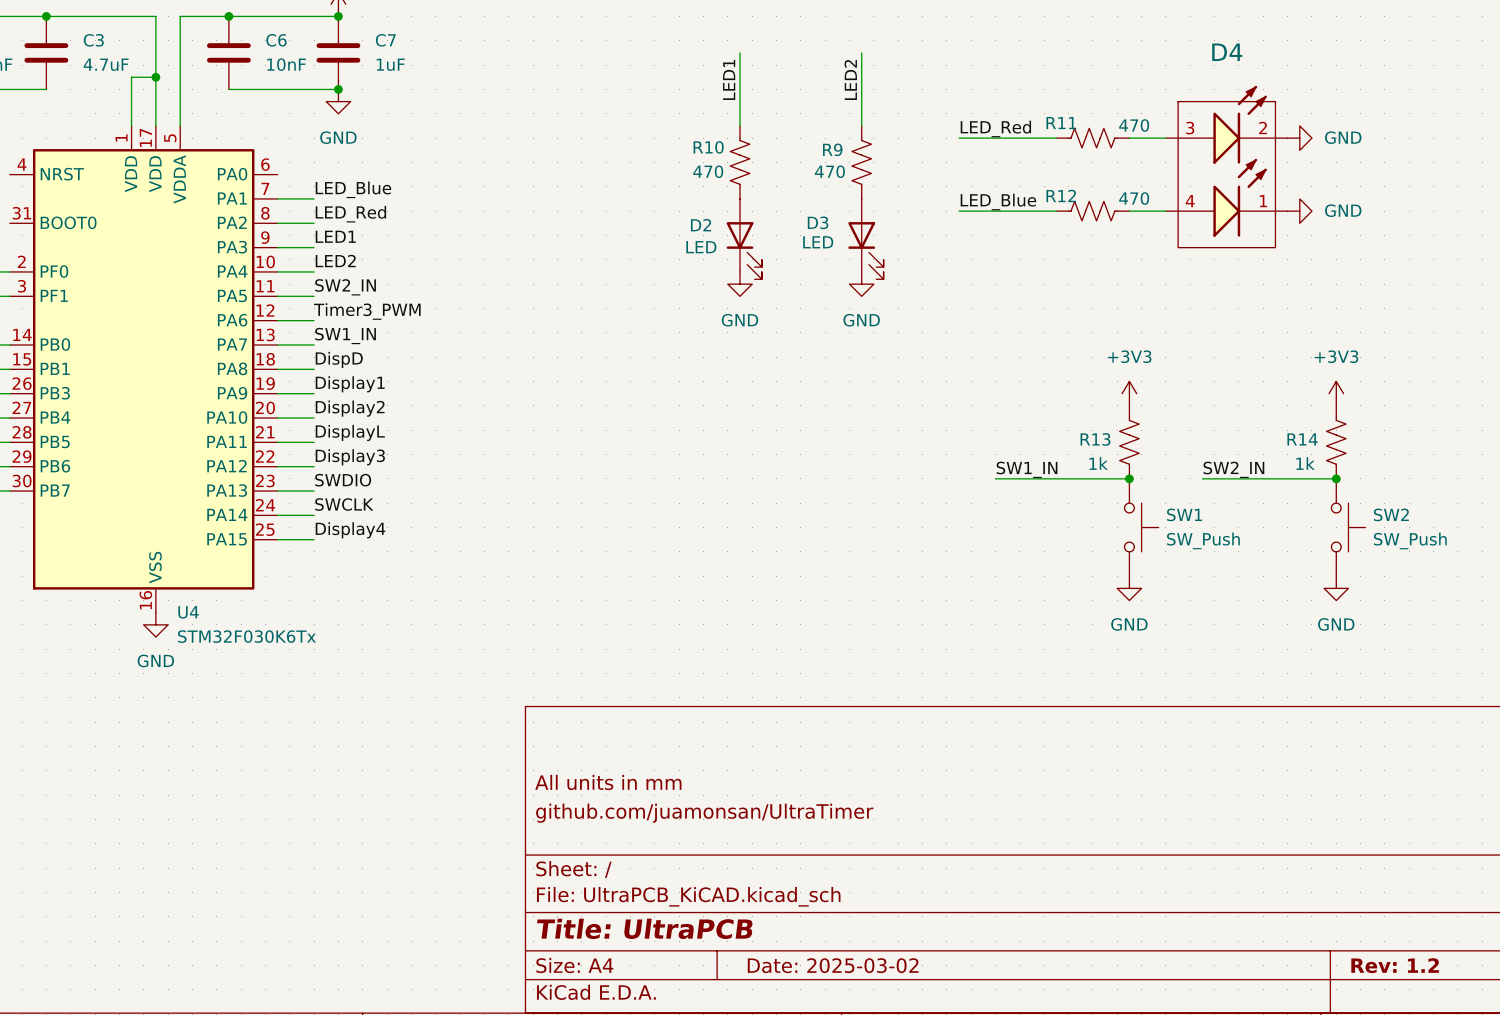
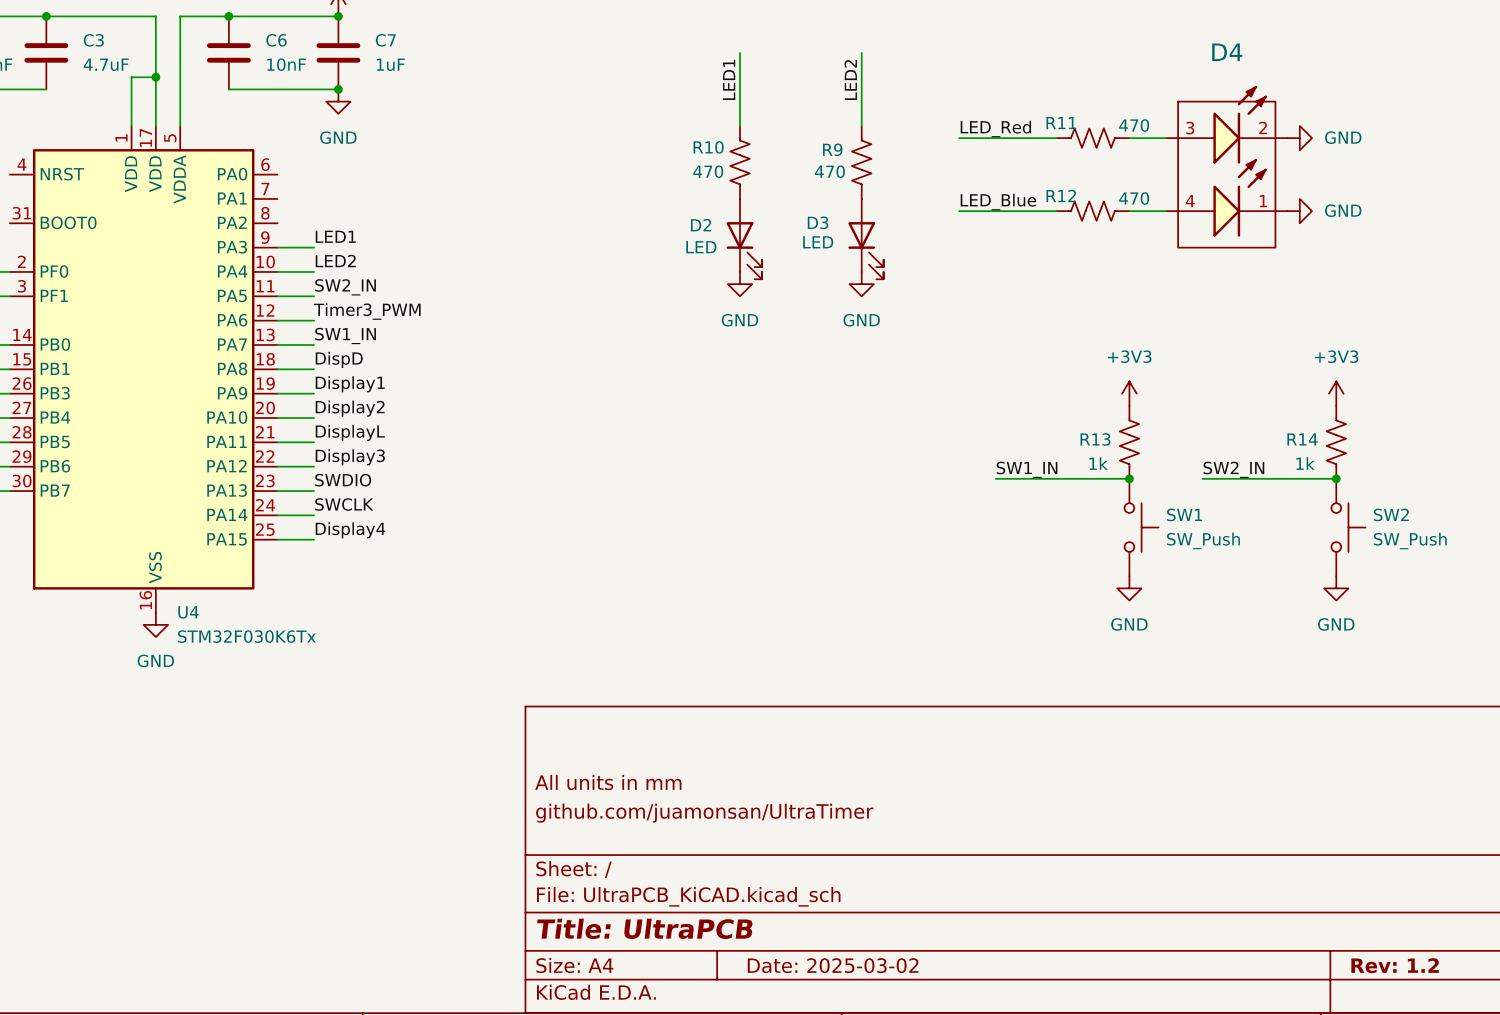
label: LED_Blue (353, 189) -> none
wire: (277, 198) (314, 198) -> none
label: LED_Red (350, 214) -> none
wire: (277, 223) (314, 223) -> none

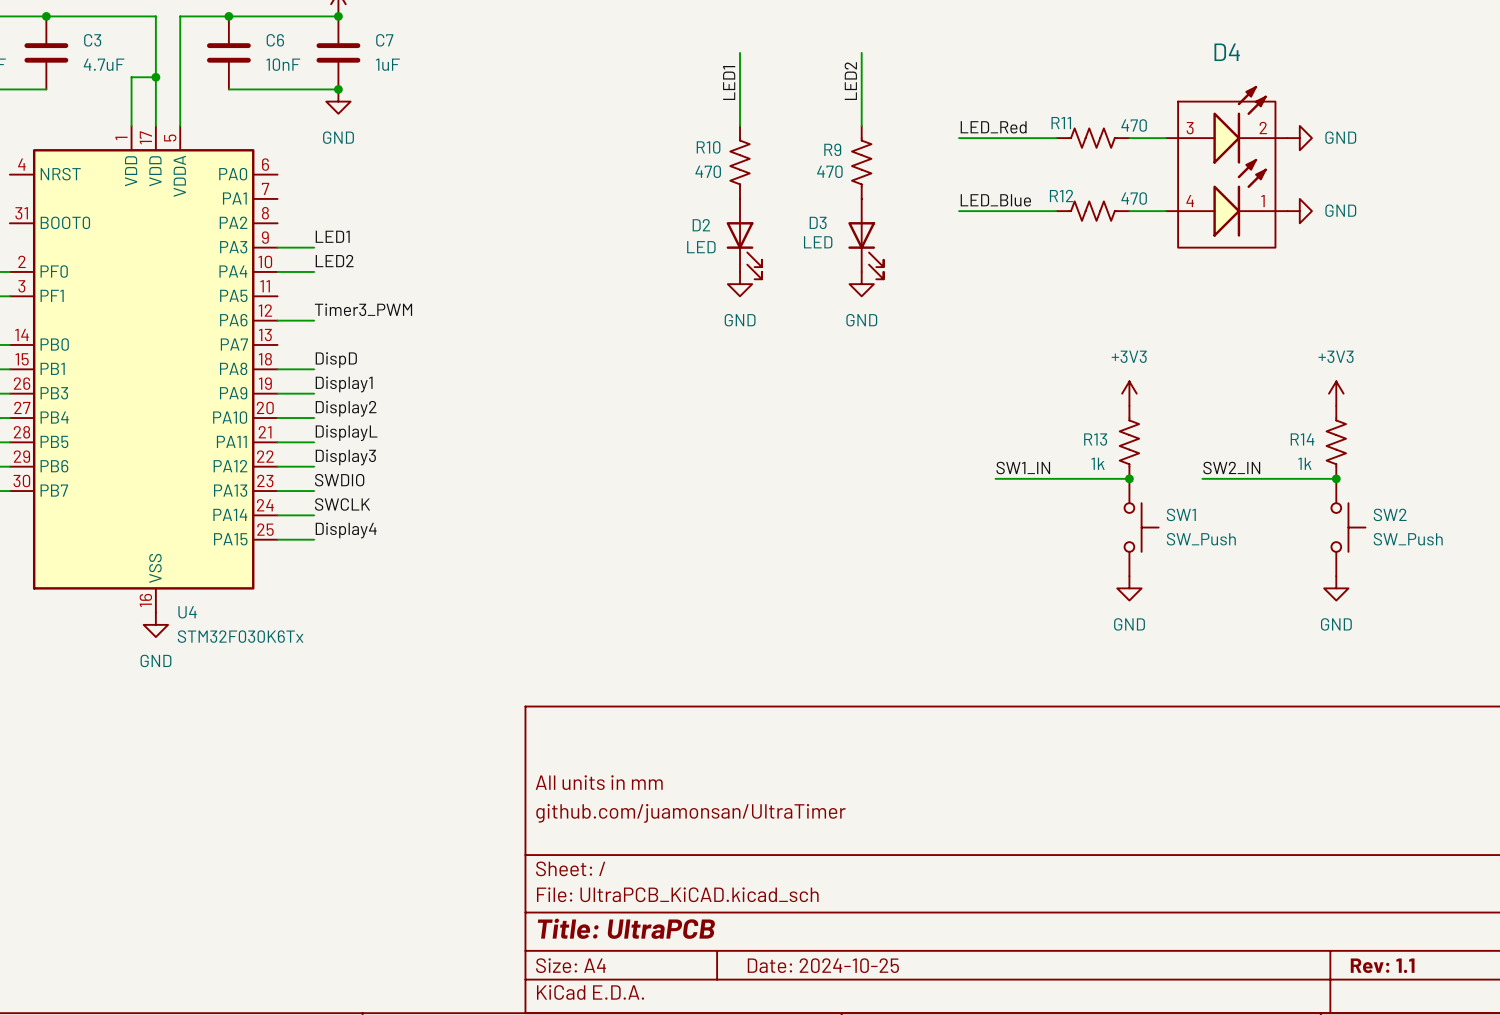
label: SW2_IN (345, 287) -> none
wire: (277, 296) (314, 296) -> none
label: SW1_IN (345, 335) -> none
wire: (277, 344) (314, 344) -> none
title block: Date: 2025-03-02 (833, 965) -> Date: 2024-10-25 (823, 965)
title block: Rev: 1.2 (1395, 965) -> Rev: 1.1 (1382, 965)

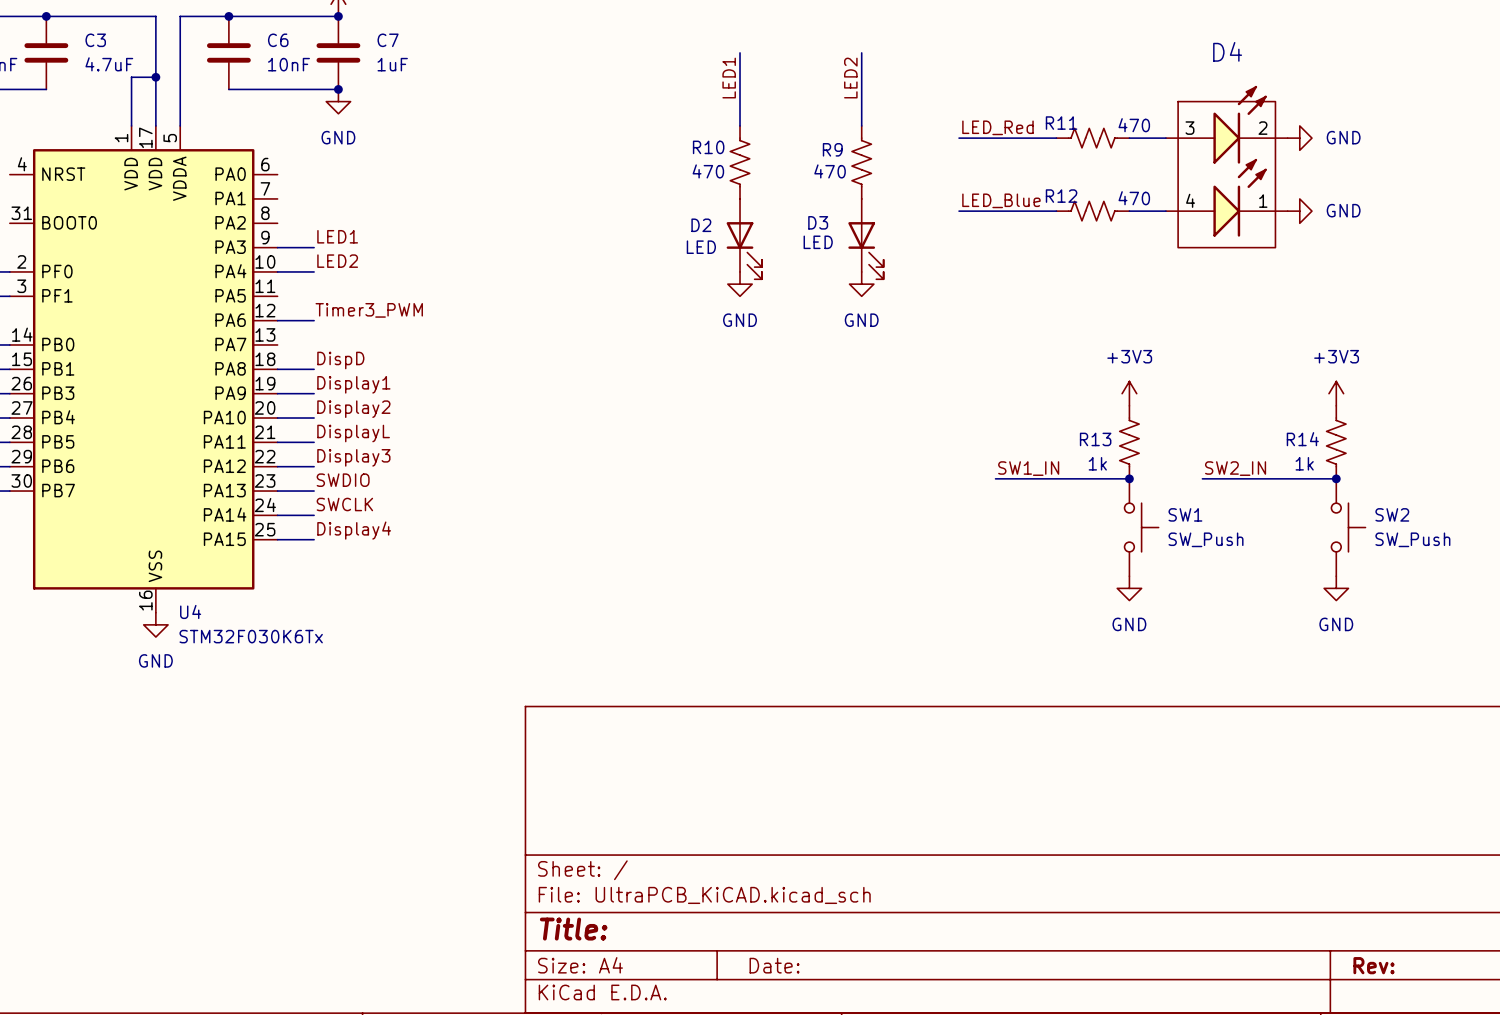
title block: All units in mm (599, 782) -> none
title block: github.com/juamonsan/UltraTimer (690, 813) -> none
title block: Title: UltraPCB (626, 928) -> Title: (573, 929)
title block: Date: 2024-10-25 (823, 965) -> Date: (774, 965)
title block: Rev: 1.1 (1382, 965) -> Rev: (1374, 965)

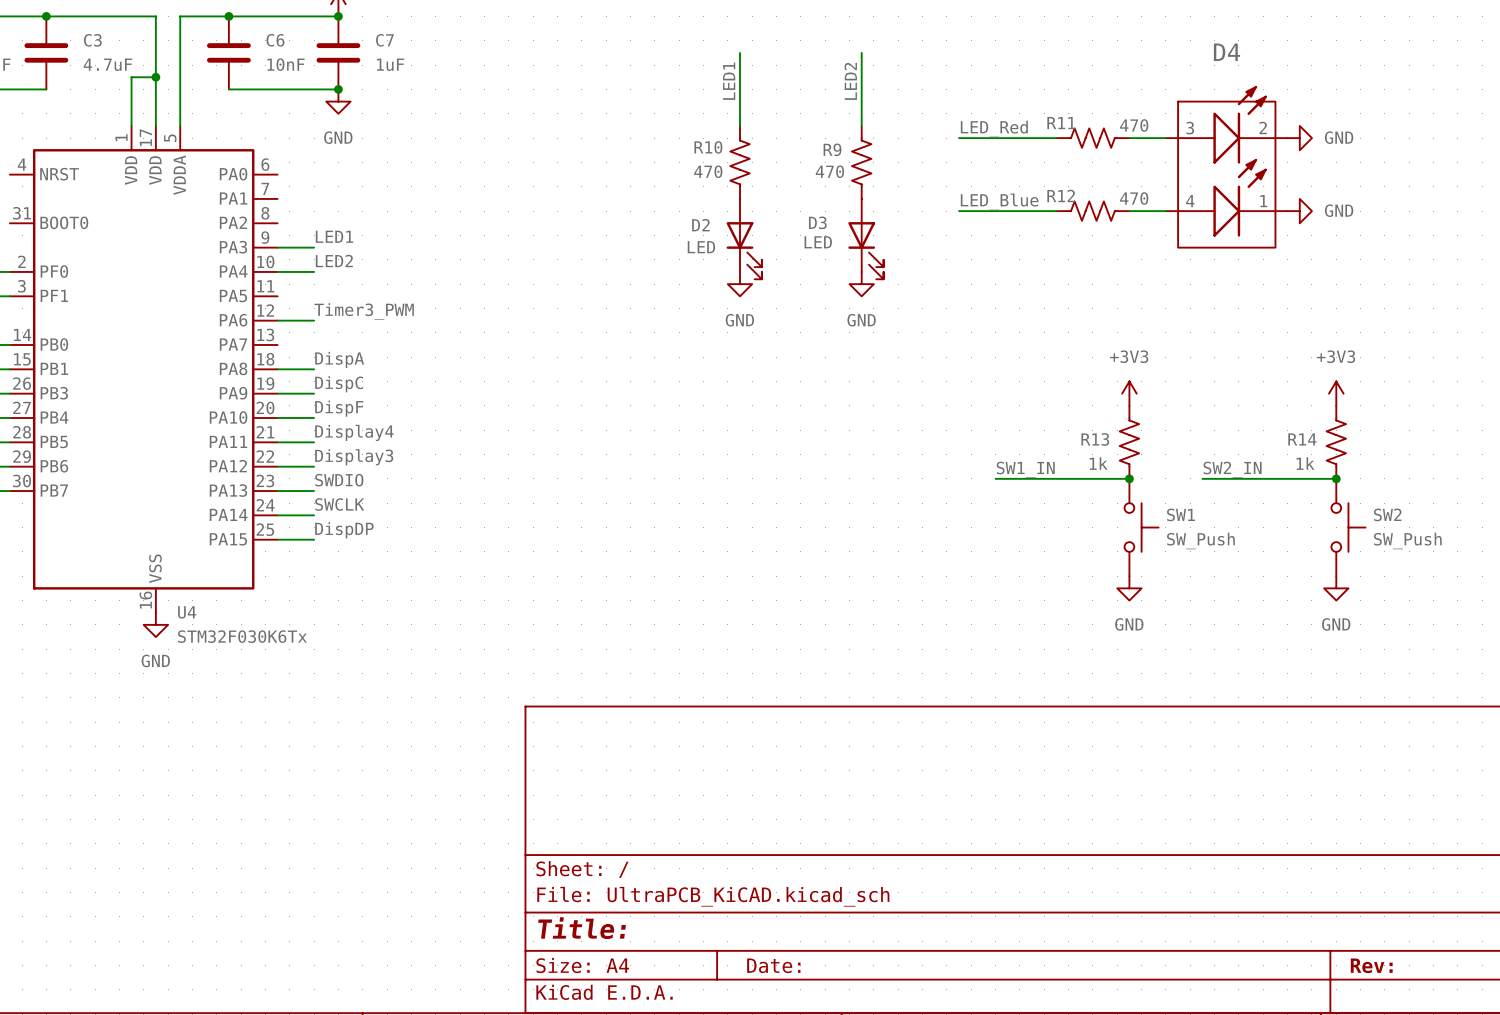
label: DispD (340, 360) -> DispA (339, 359)
label: Display1 (353, 384) -> DispC (339, 384)
label: Display2 (353, 409) -> DispF (339, 408)
label: DisplayL (353, 433) -> Display4 (354, 432)
label: Display4 (354, 530) -> DispDP (344, 530)

